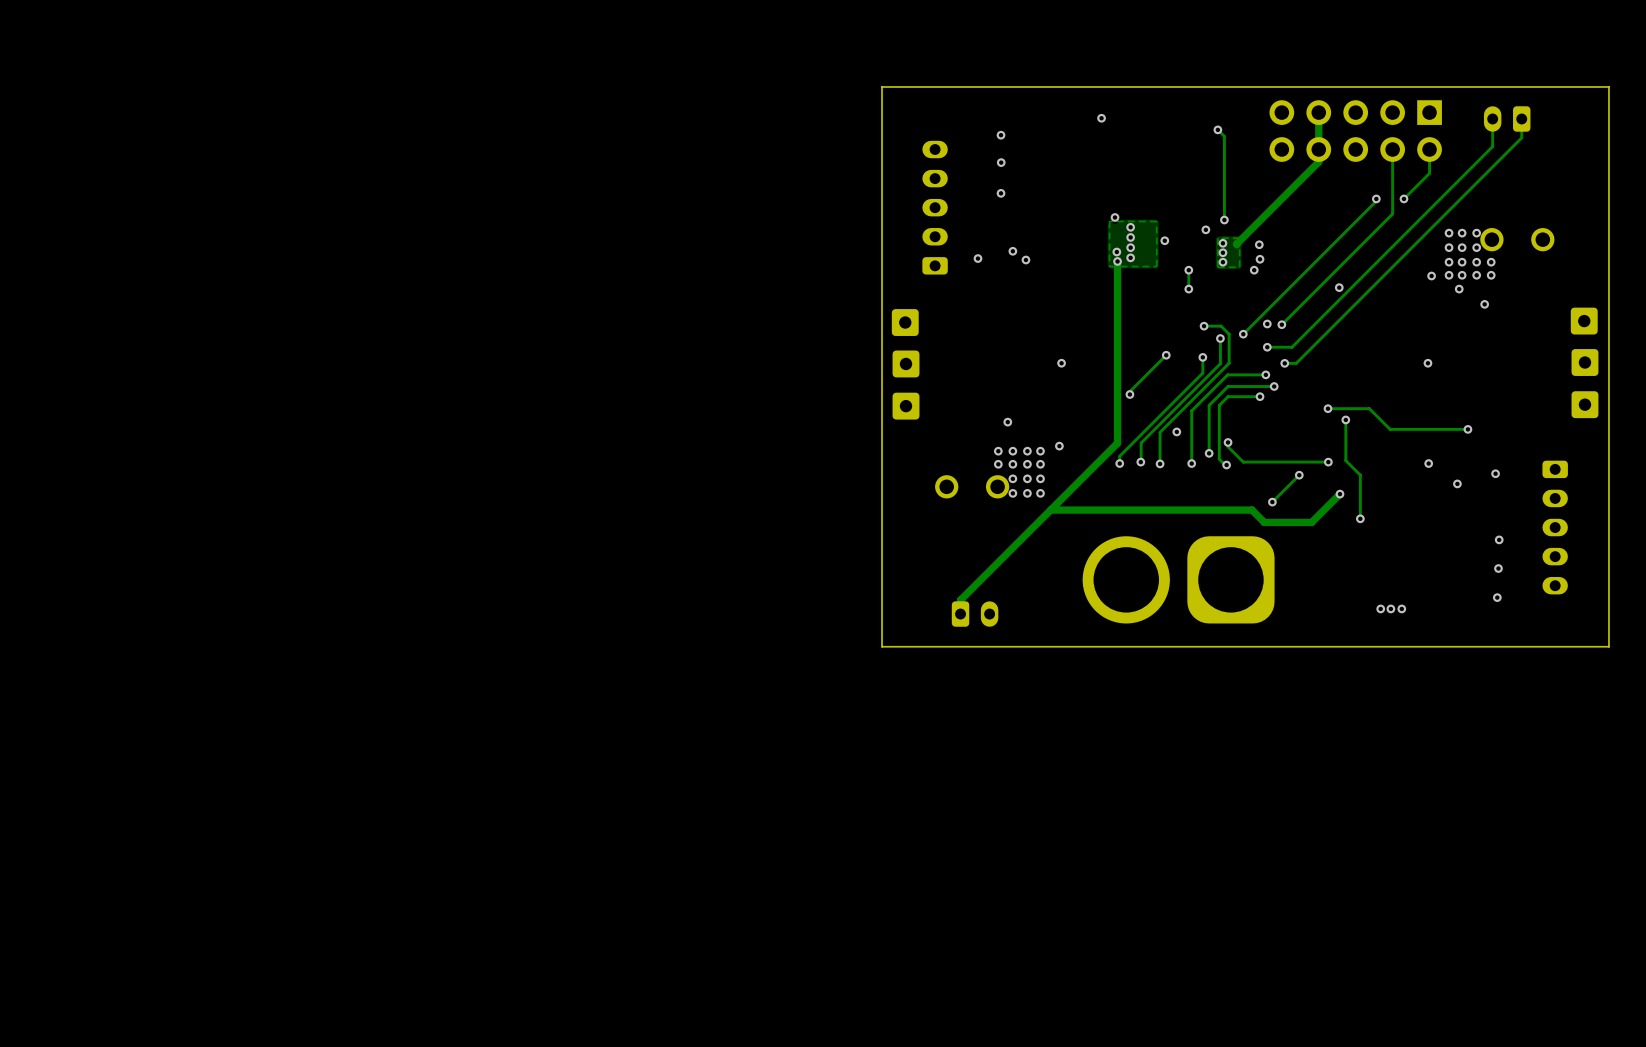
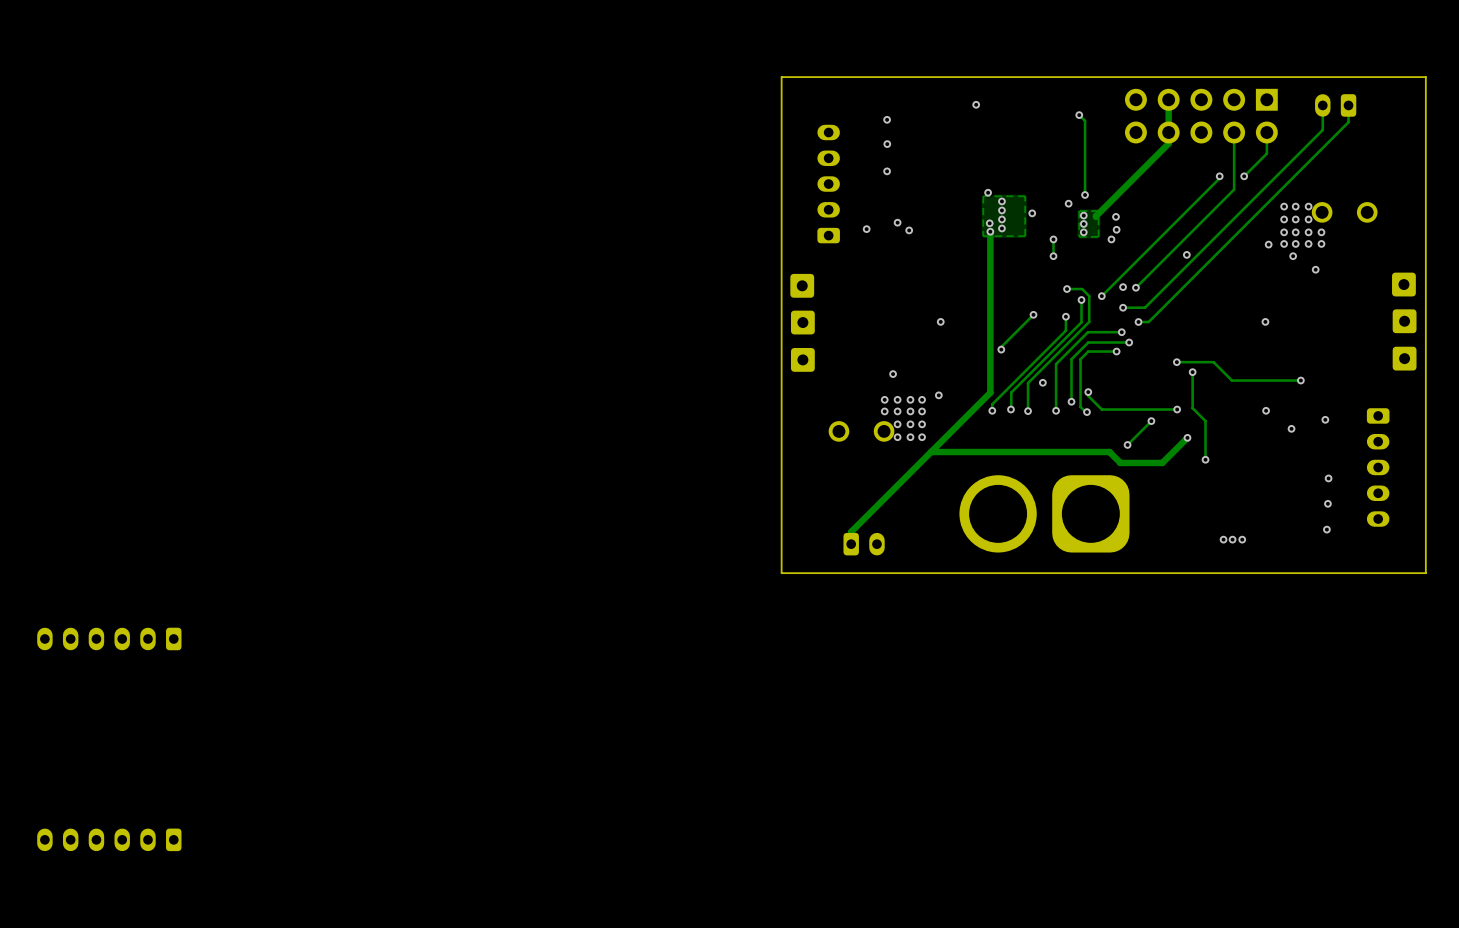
part: none -> (109, 638)
part: none -> (109, 839)

